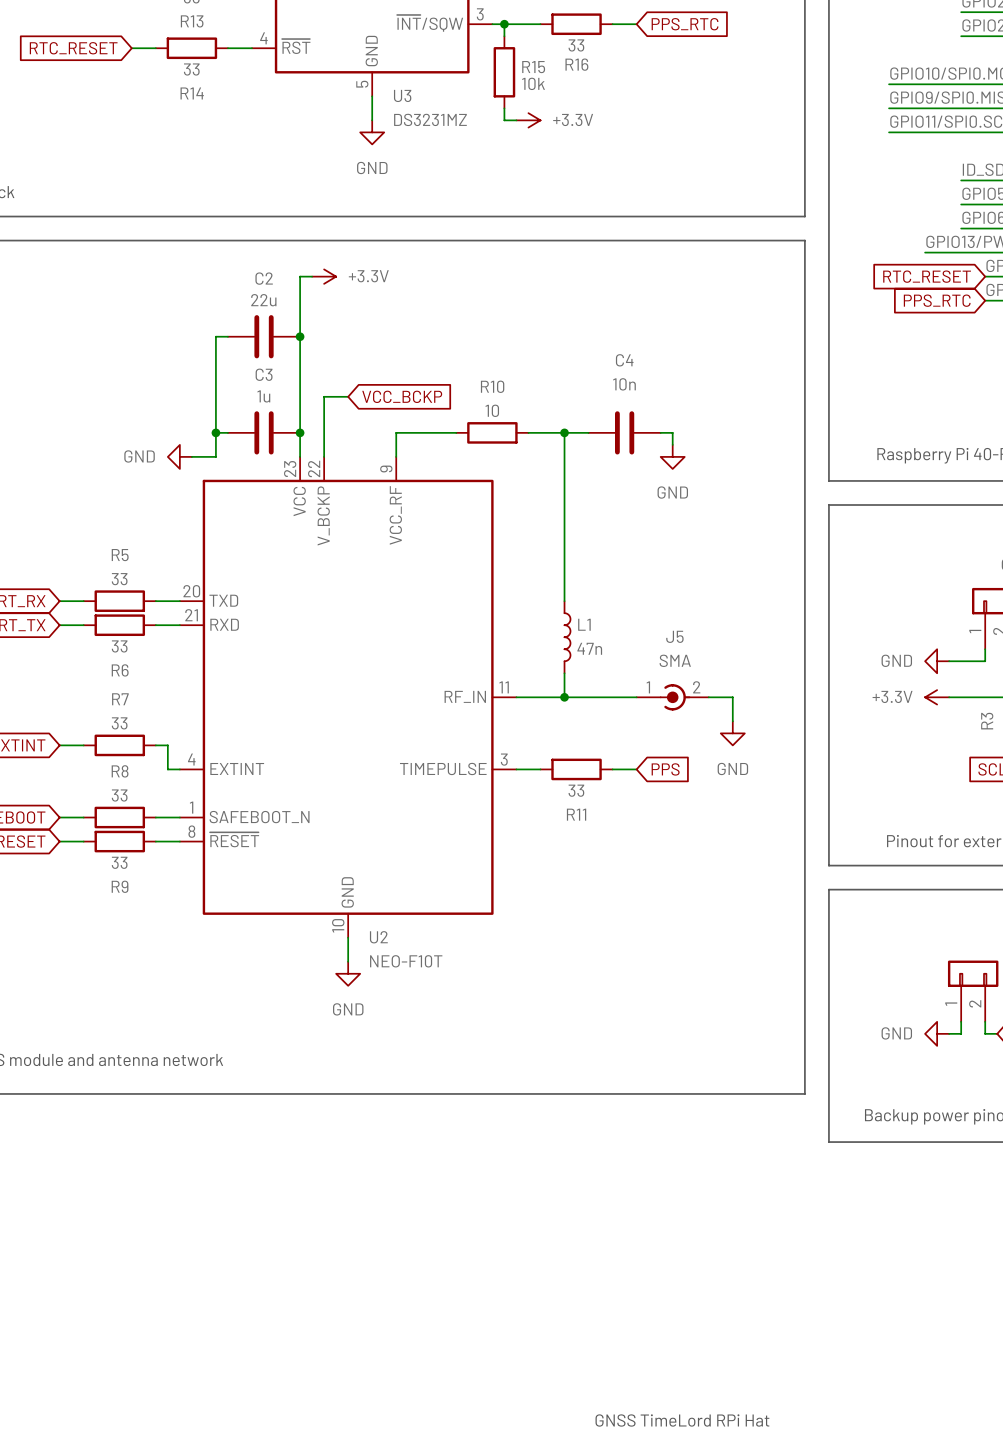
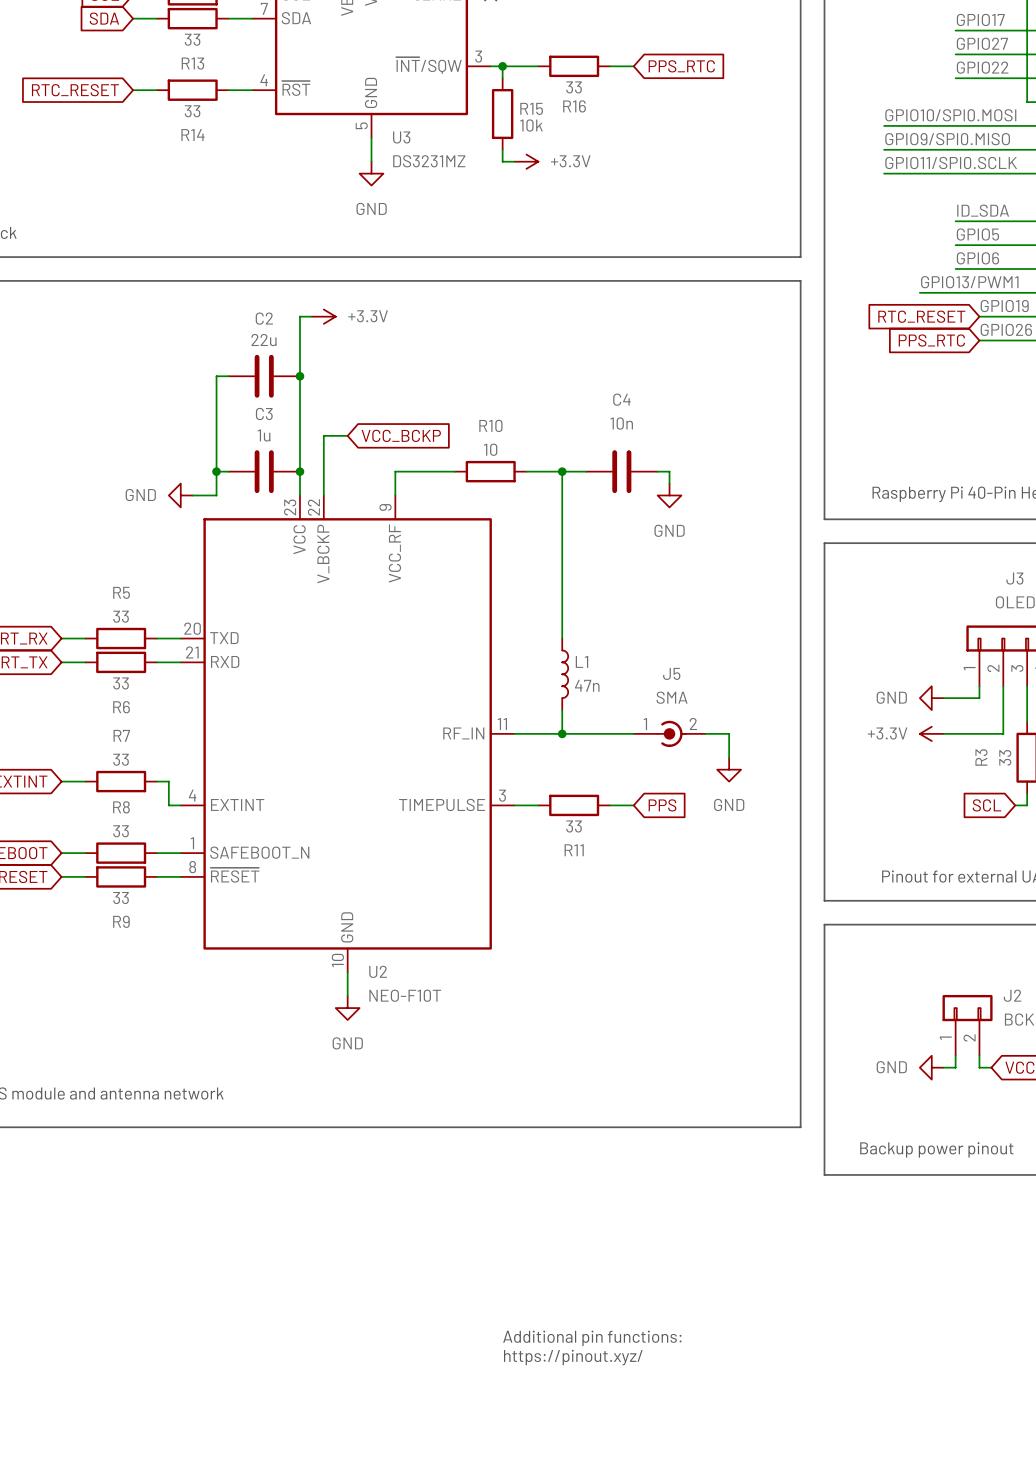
text: none -> Additional pin functions: (592, 1338)
text: none -> https://pinout.xyz/ (573, 1357)
text: GNSS TimeLord RPi Hat (682, 1420) -> none

